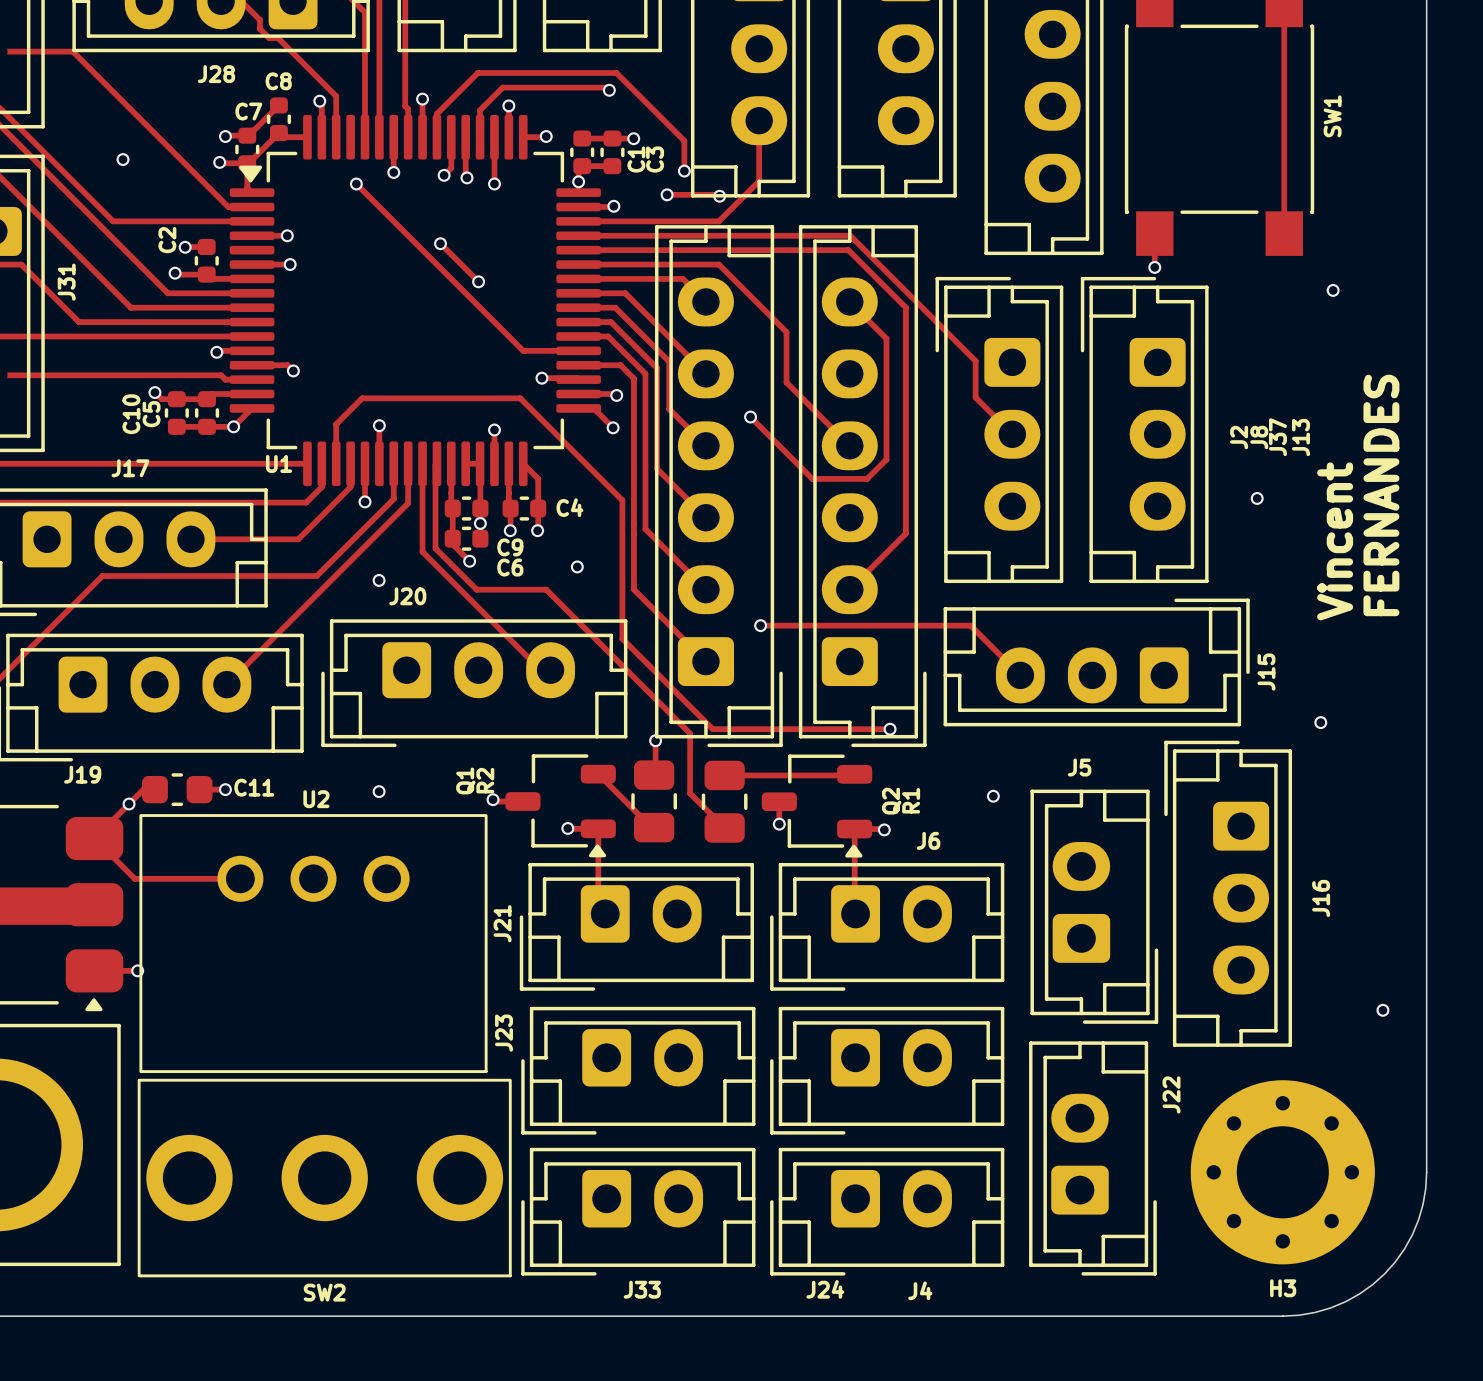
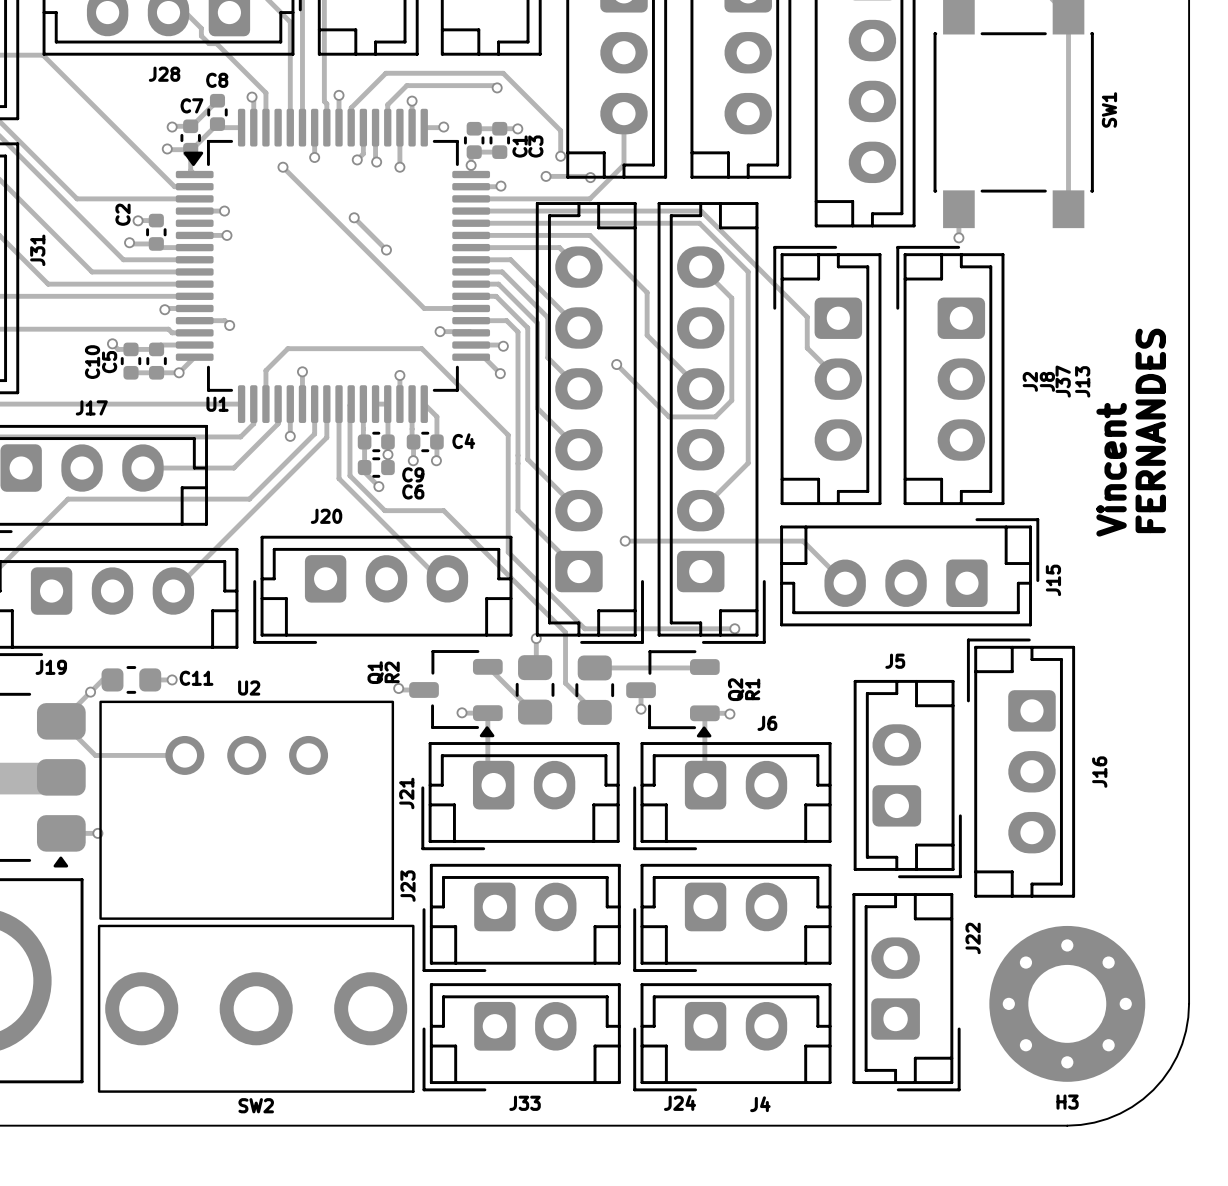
via: (123, 159) -> none
via: (1333, 290) -> none
via: (1257, 498) -> none
via: (577, 566) -> none
via: (379, 580) -> none
via: (1320, 722) -> none
via: (379, 791) -> none
via: (993, 796) -> none
via: (1382, 1010) -> none

